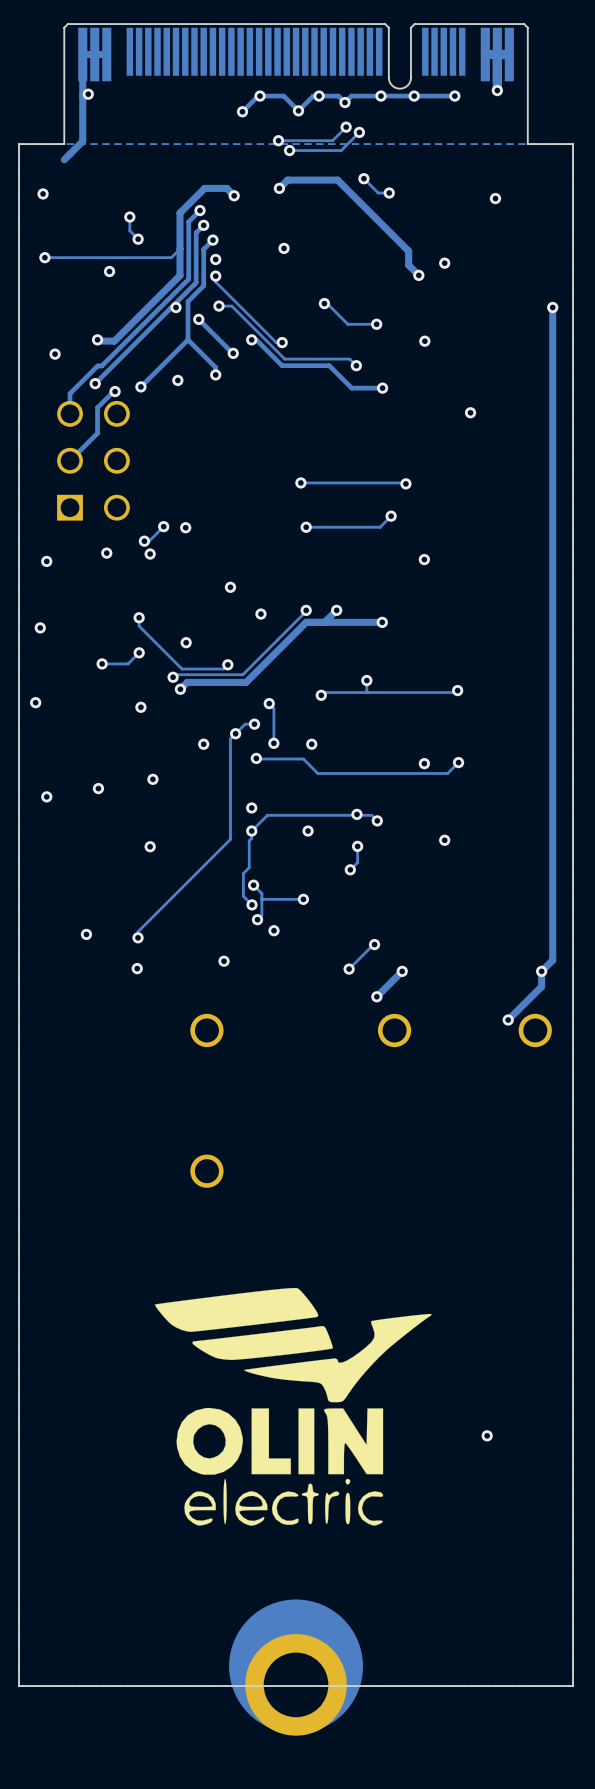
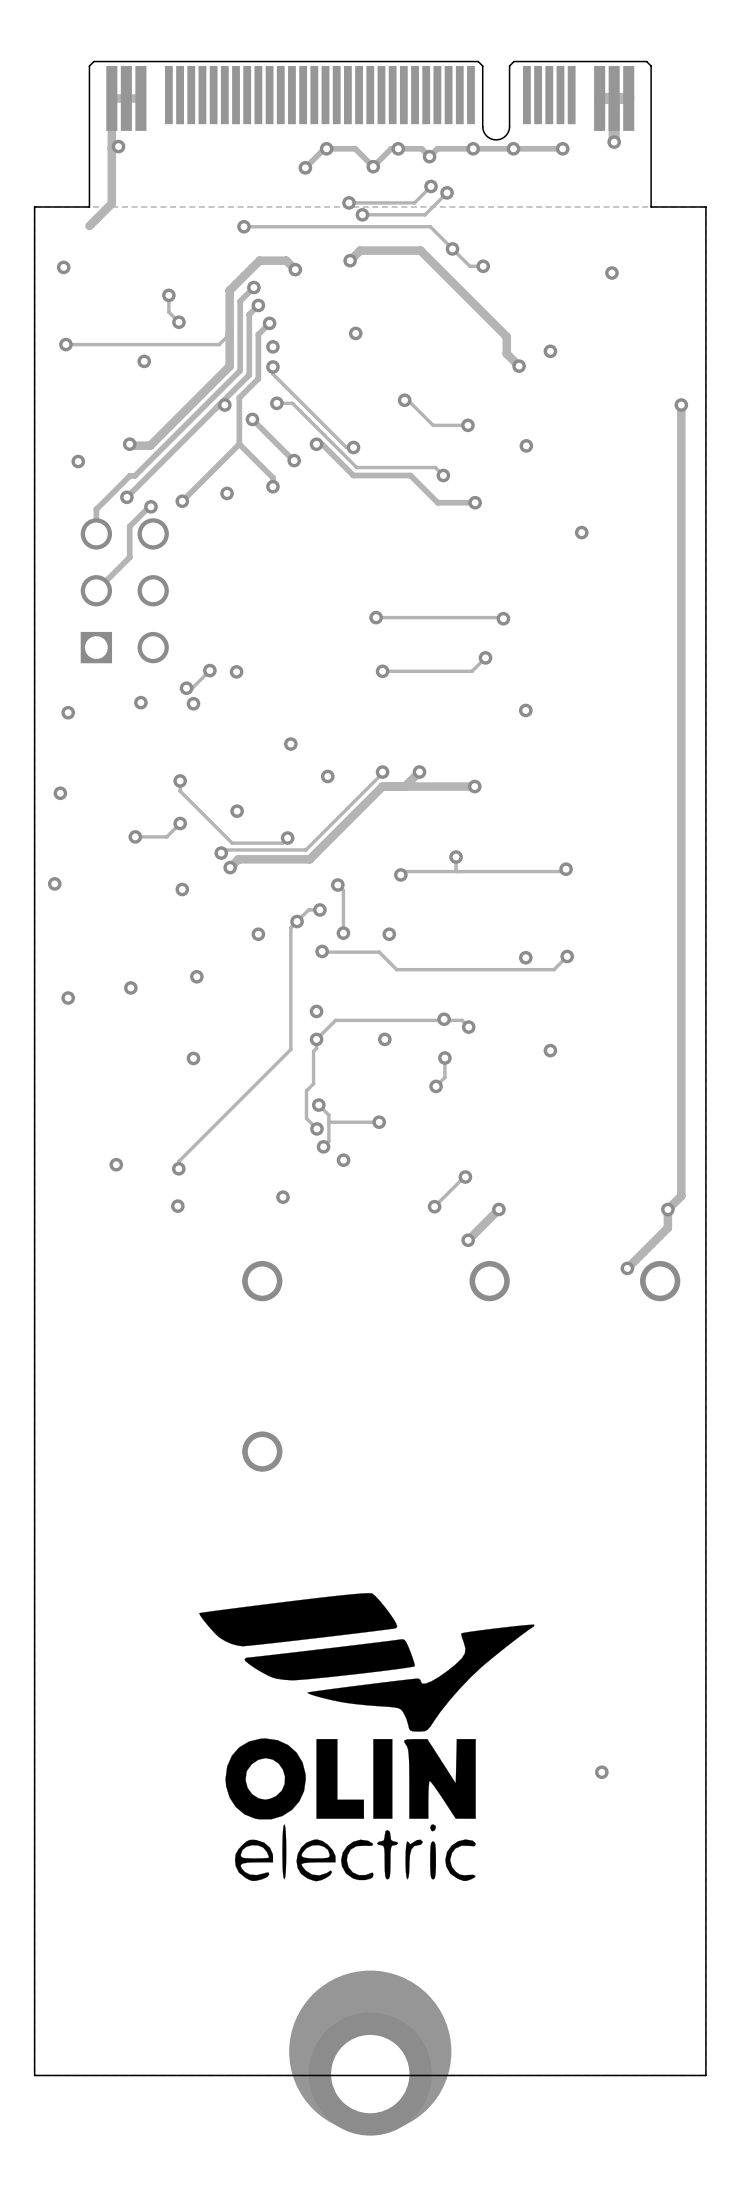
track: none -> (244, 226) (430, 226) (452, 248)
via: none -> (244, 226)

